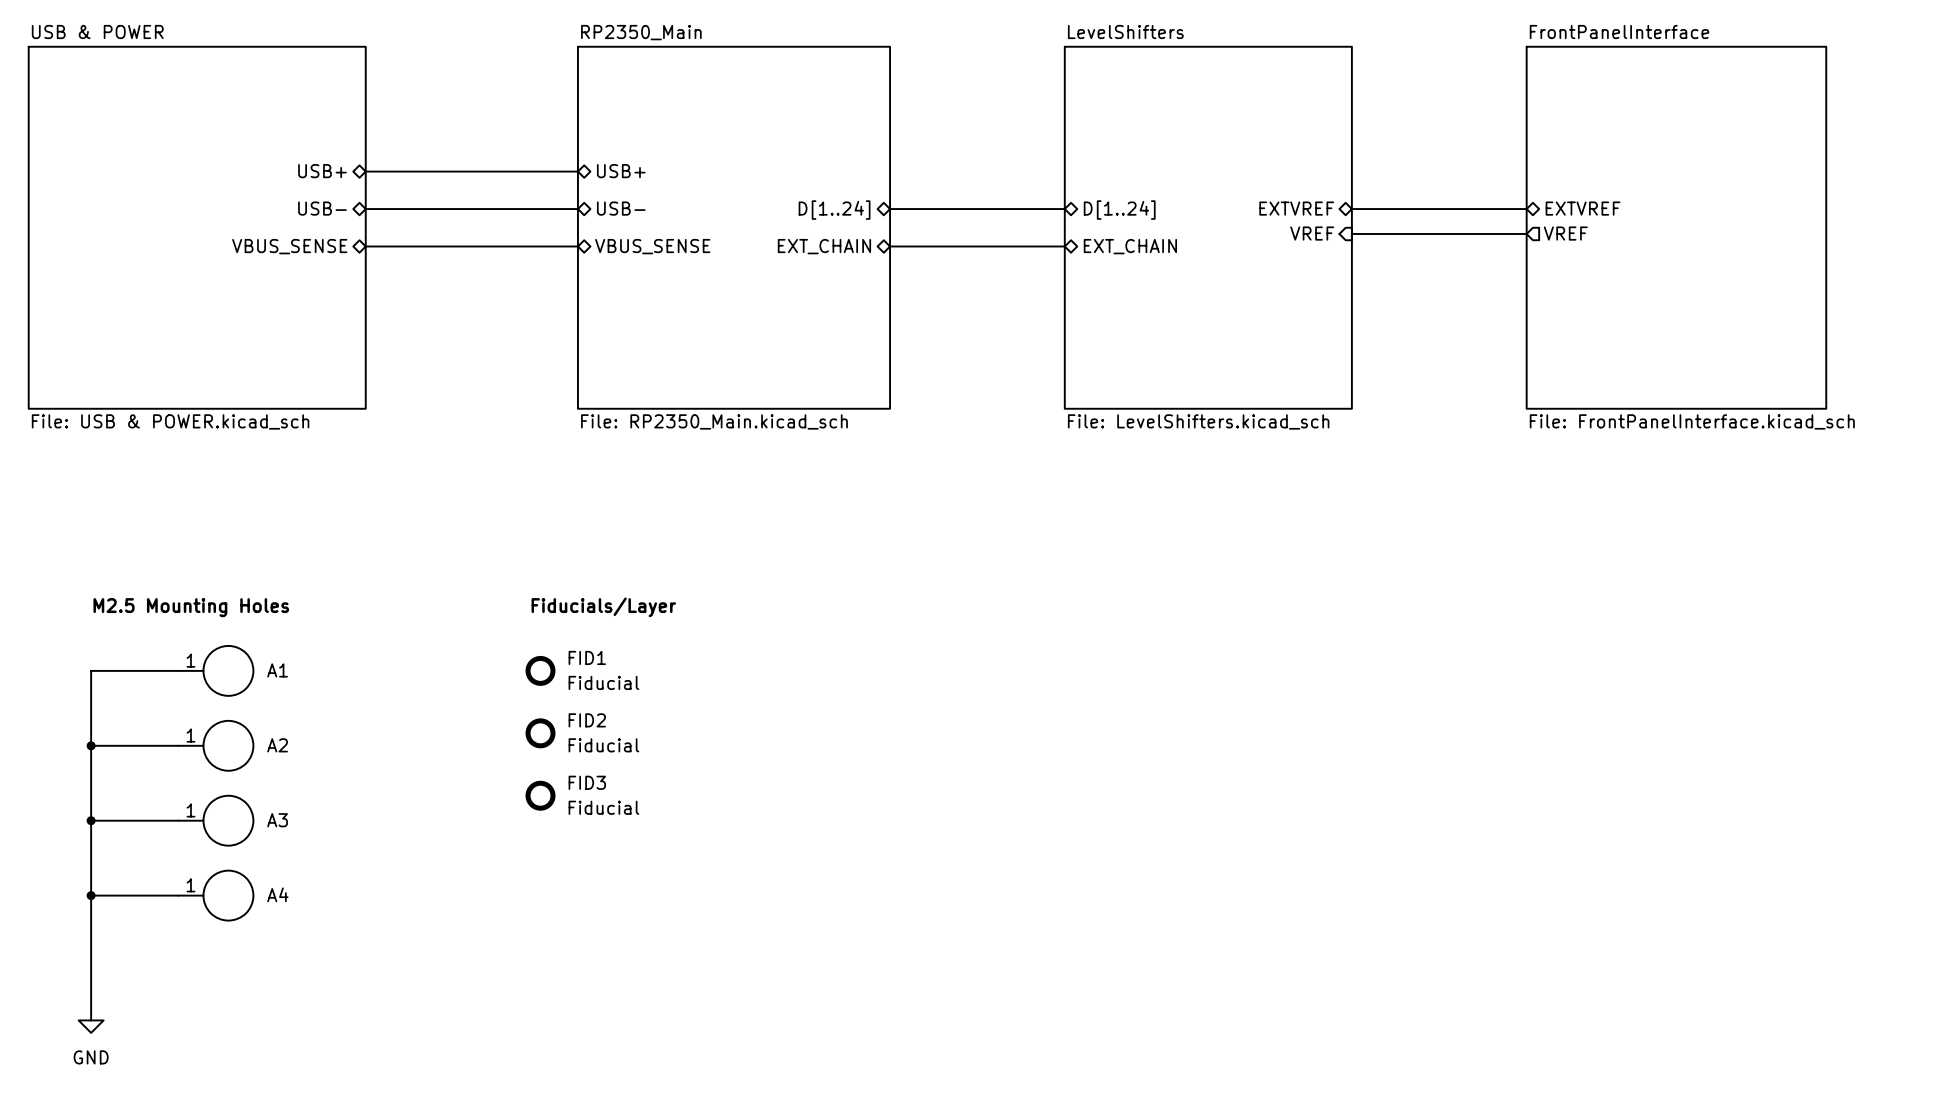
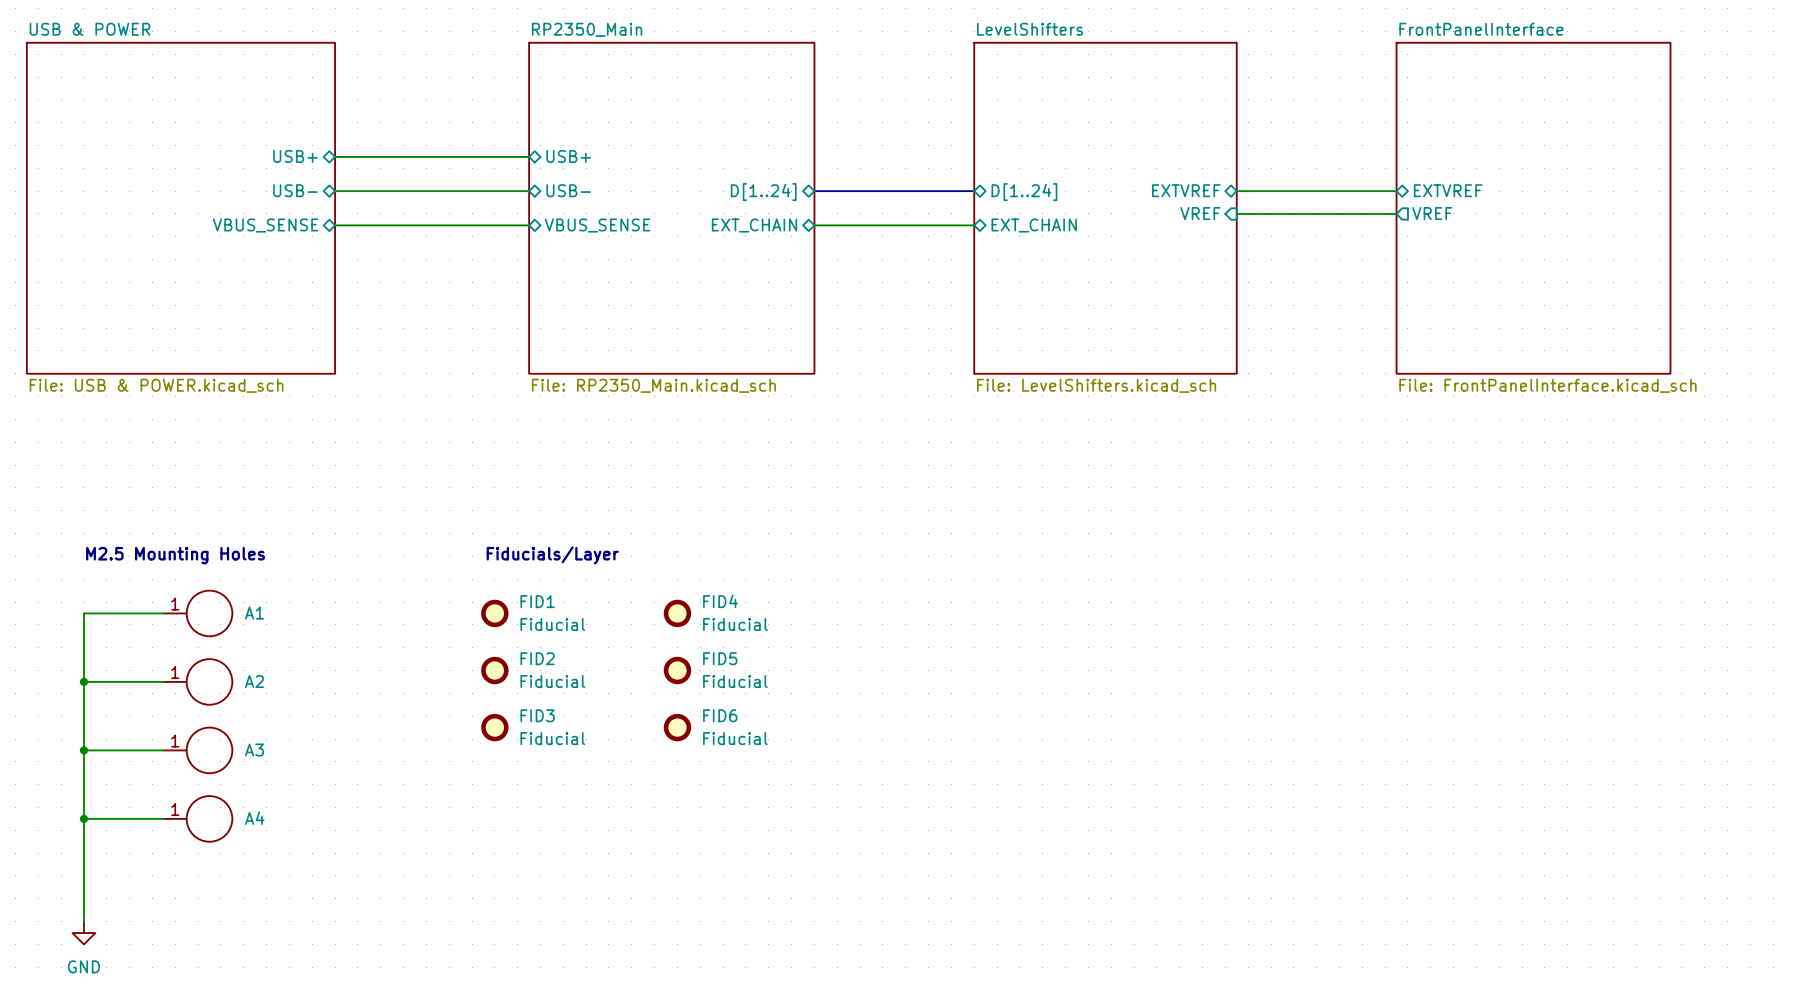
FID4: none -> Fiducial (677, 613)
FID5: none -> Fiducial (677, 670)
FID6: none -> Fiducial (677, 727)

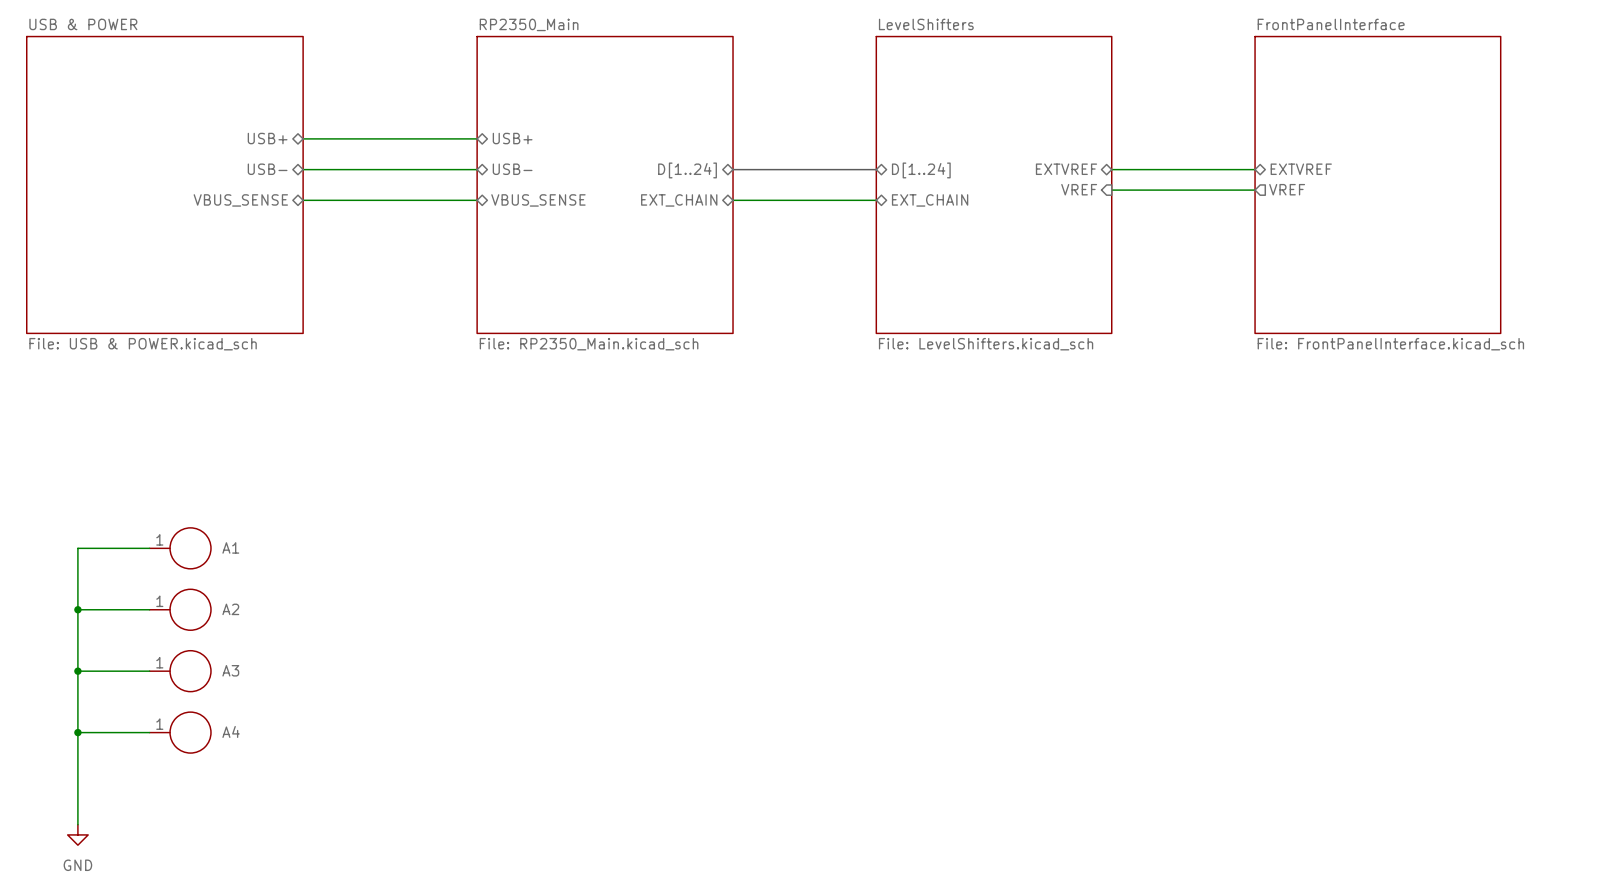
text: M2.5 Mounting Holes (175, 555) -> none
text: Fiducials/Layer (552, 555) -> none
FID1: Fiducial (494, 613) -> none
FID4: Fiducial (677, 613) -> none
FID2: Fiducial (494, 670) -> none
FID5: Fiducial (677, 670) -> none
FID3: Fiducial (494, 727) -> none
FID6: Fiducial (677, 727) -> none

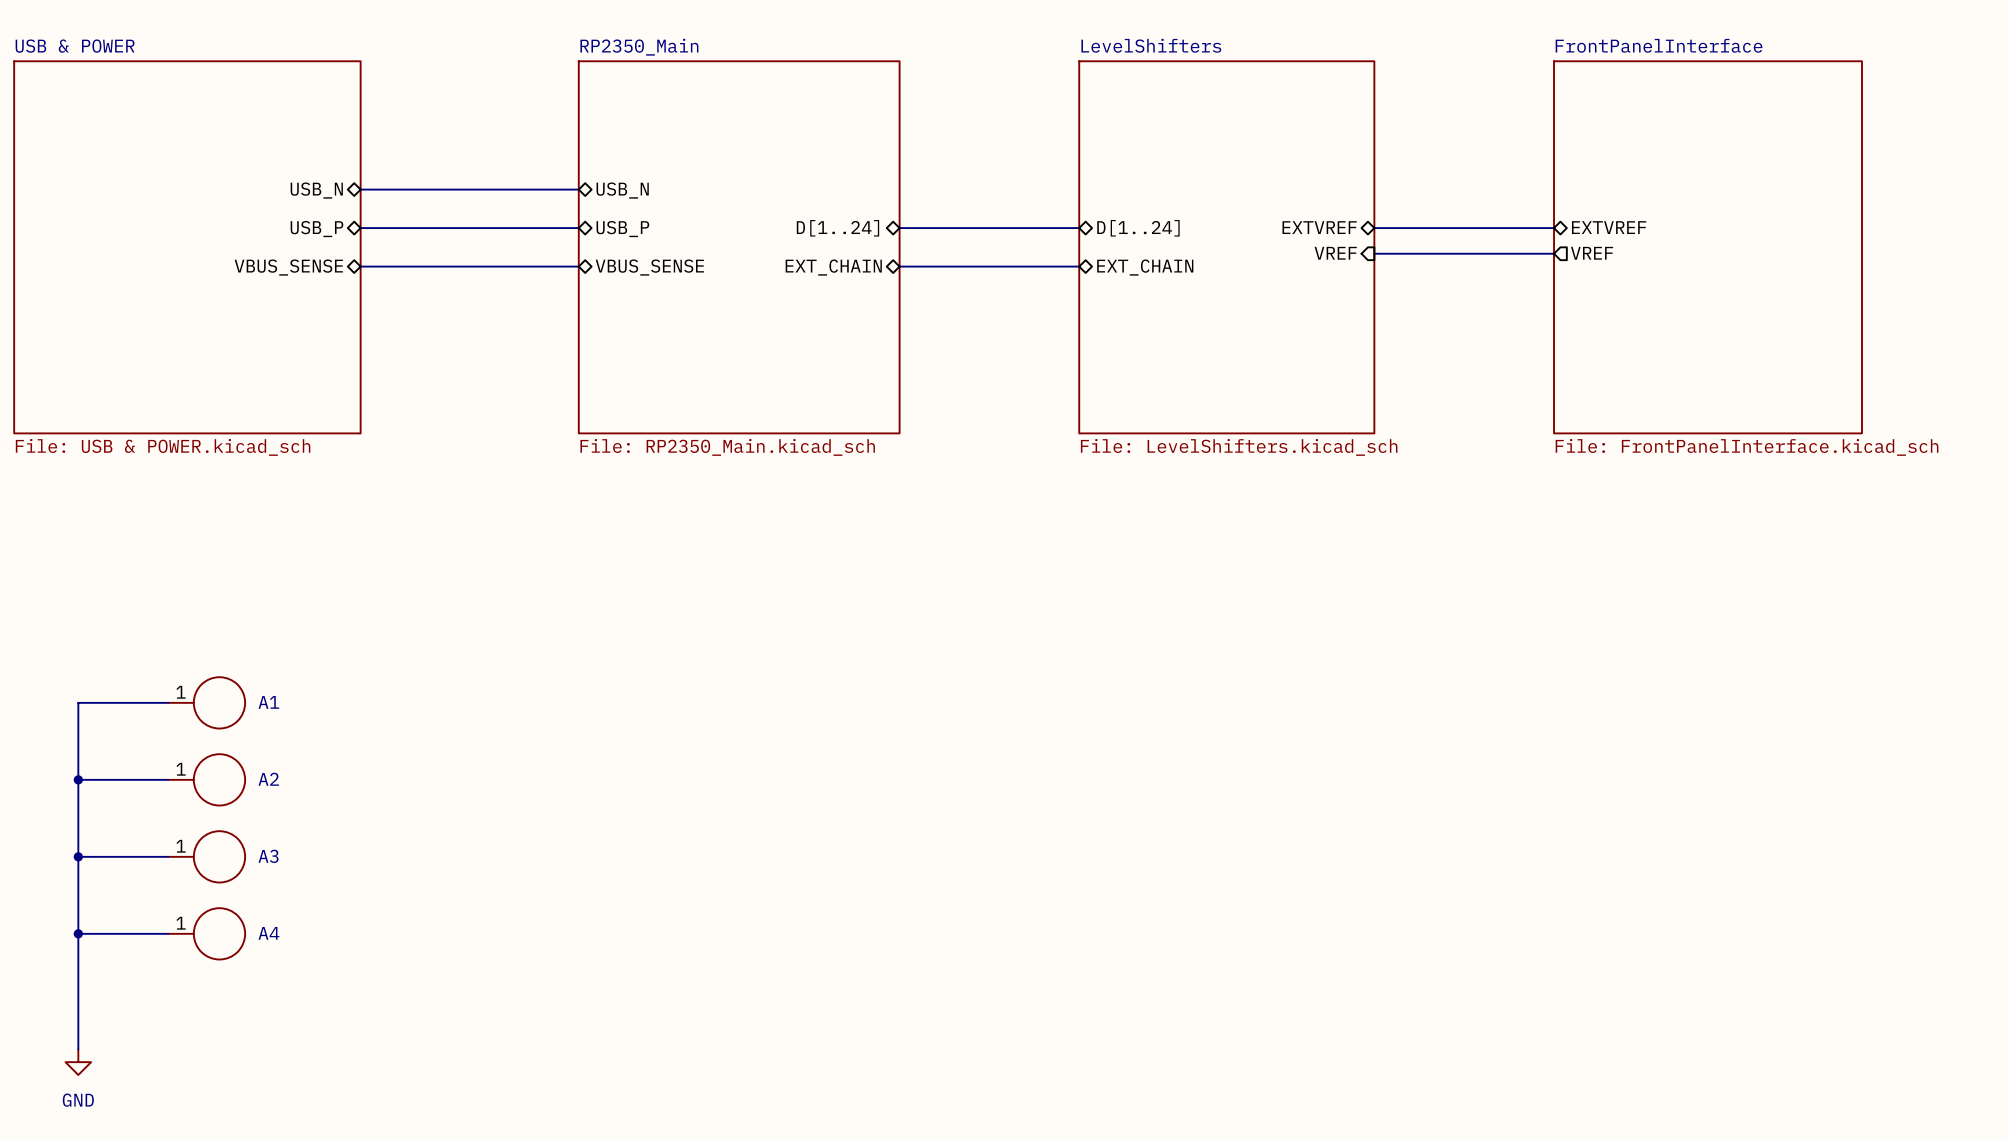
sheet pin: USB+ (267, 138) -> USB_N (316, 190)
sheet pin: USB+ (512, 138) -> USB_N (622, 190)
sheet pin: USB- (267, 169) -> USB_P (316, 229)
sheet pin: USB- (512, 169) -> USB_P (622, 229)

